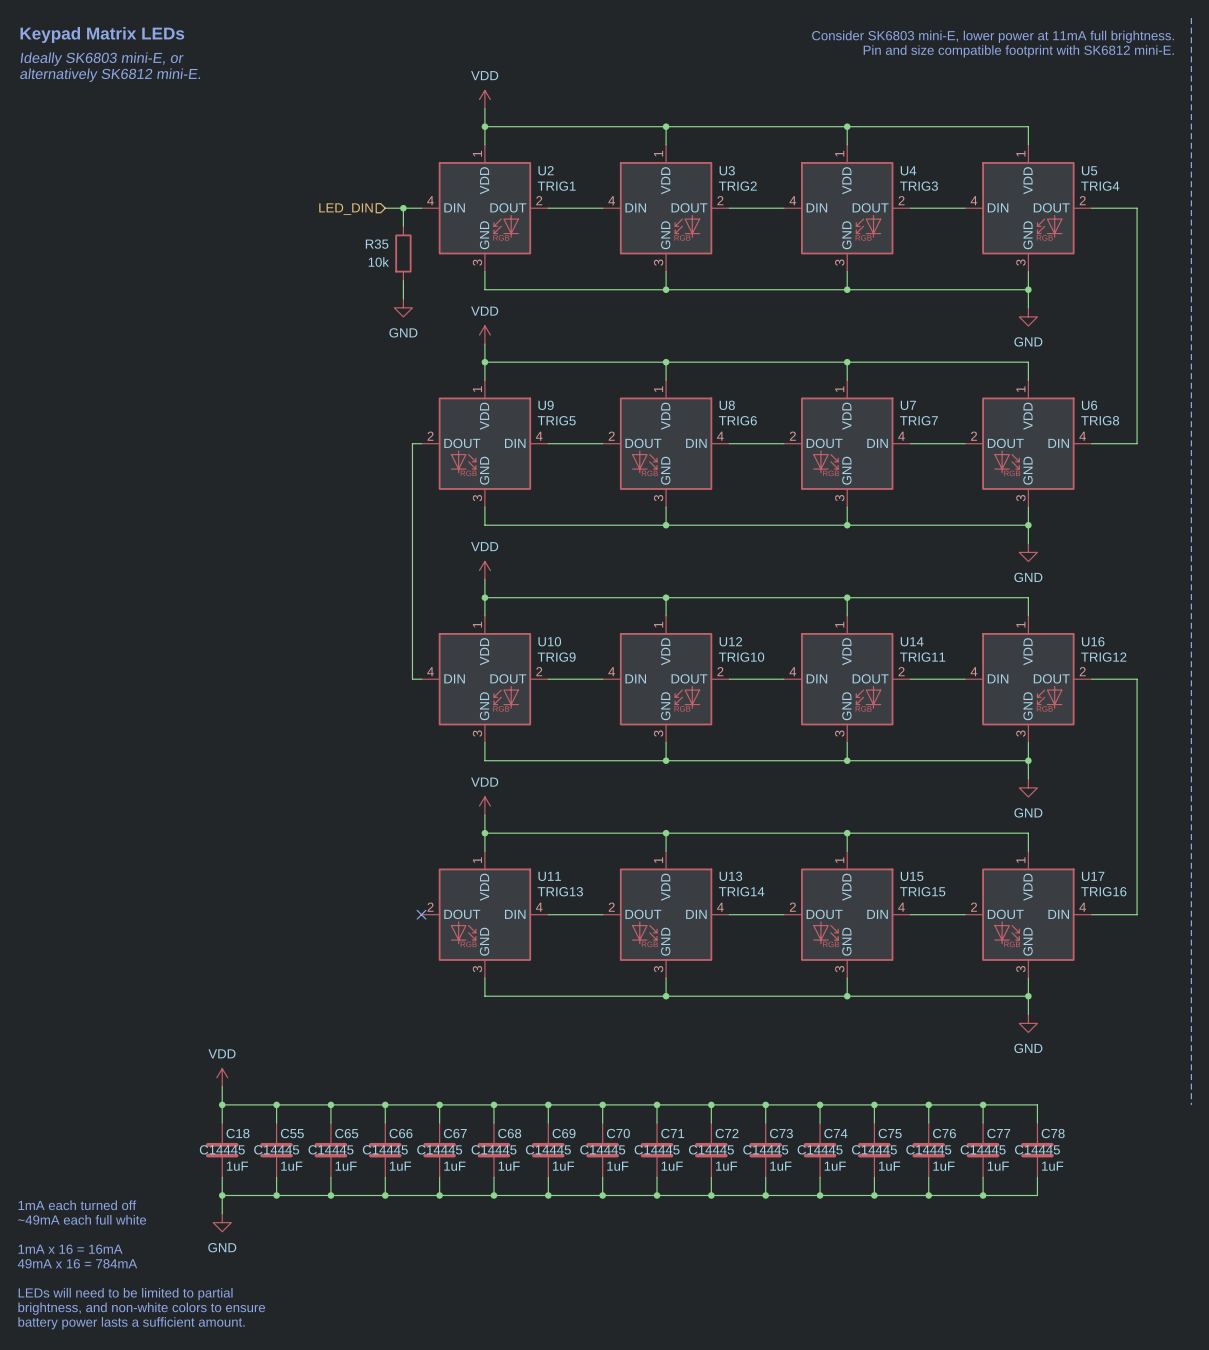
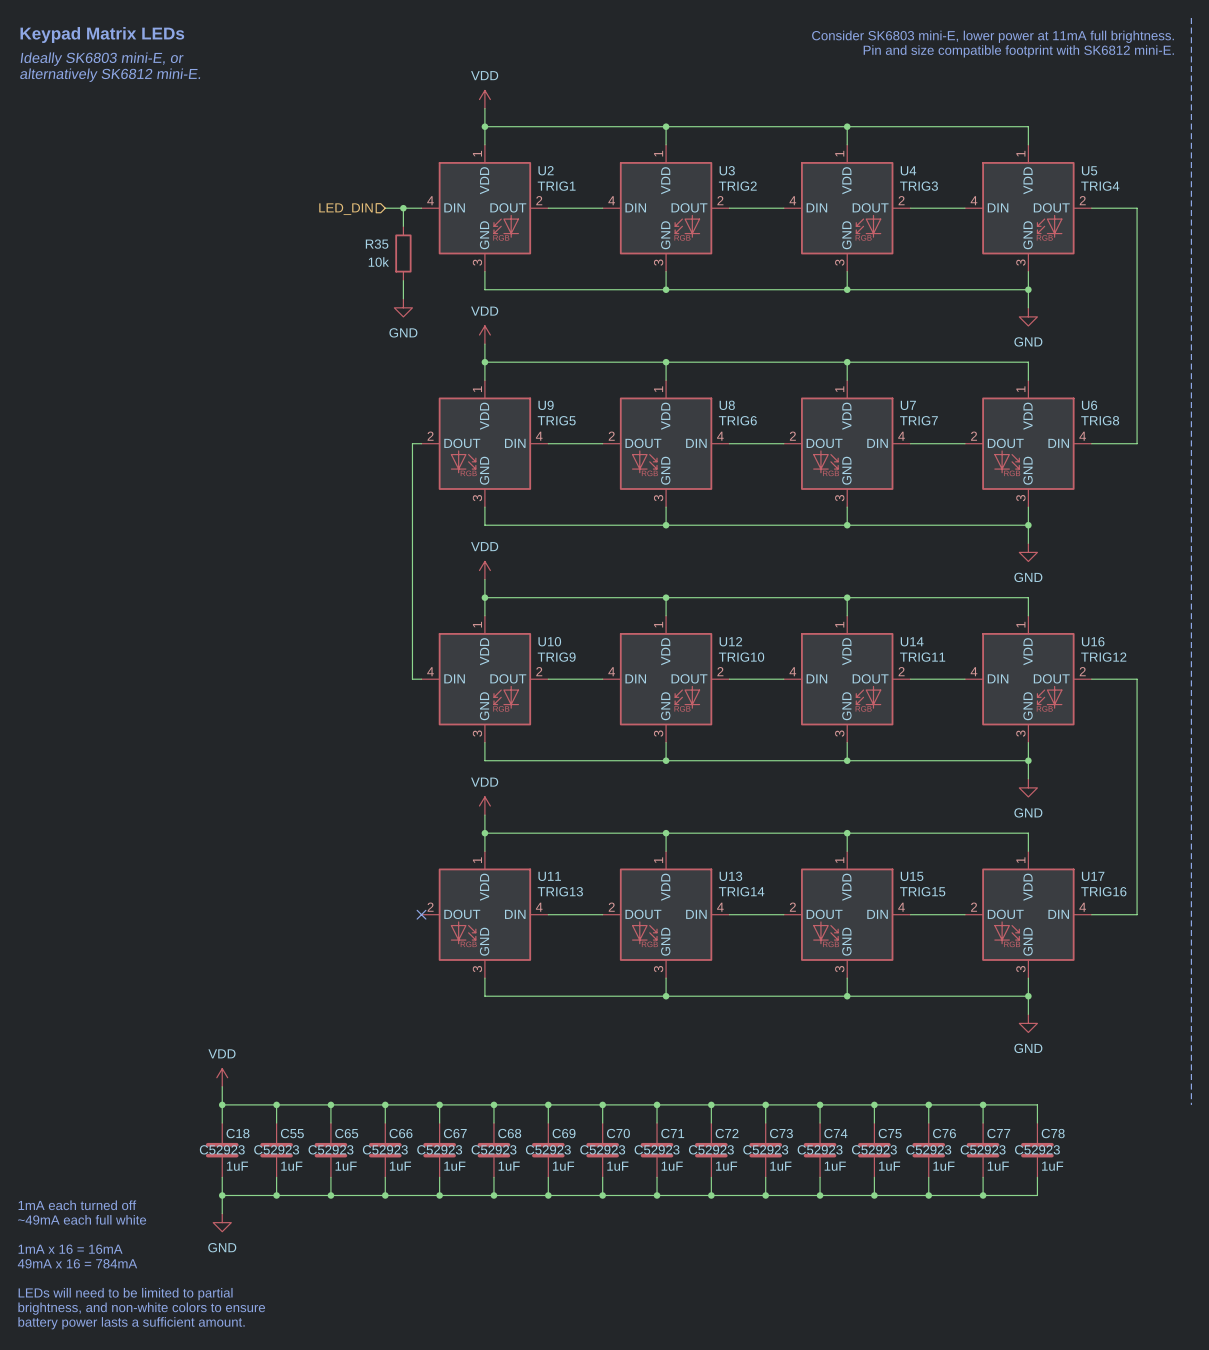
C18 text: C14445 (222, 1149) -> C52923 (222, 1149)
C55 text: C14445 (276, 1149) -> C52923 (276, 1149)
C65 text: C14445 (331, 1149) -> C52923 (330, 1149)
C66 text: C14445 (385, 1149) -> C52923 (385, 1149)
C67 text: C14445 (439, 1149) -> C52923 (439, 1149)
C68 text: C14445 (494, 1149) -> C52923 (494, 1149)
C69 text: C14445 (548, 1149) -> C52923 (548, 1149)
C70 text: C14445 (602, 1149) -> C52923 (602, 1149)
C71 text: C14445 (657, 1149) -> C52923 (657, 1149)
C72 text: C14445 (711, 1149) -> C52923 (711, 1149)
C73 text: C14445 (765, 1149) -> C52923 (765, 1149)
C74 text: C14445 (820, 1149) -> C52923 (820, 1149)
C75 text: C14445 (874, 1149) -> C52923 (874, 1149)
C76 text: C14445 (928, 1149) -> C52923 (928, 1149)
C77 text: C14445 (983, 1149) -> C52923 (983, 1149)
C78 text: C14445 (1037, 1149) -> C52923 (1037, 1149)

